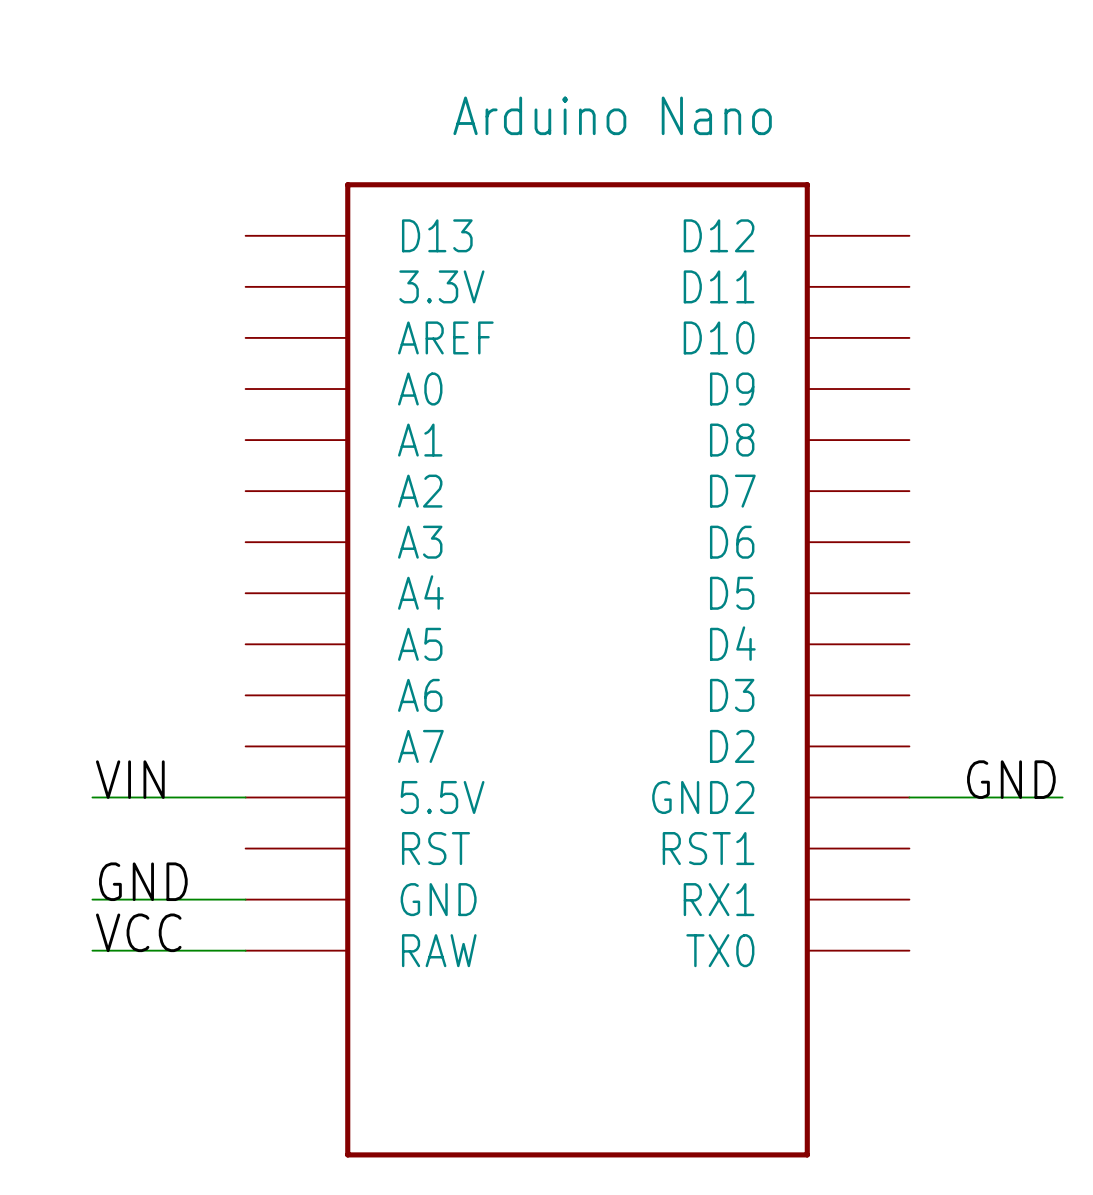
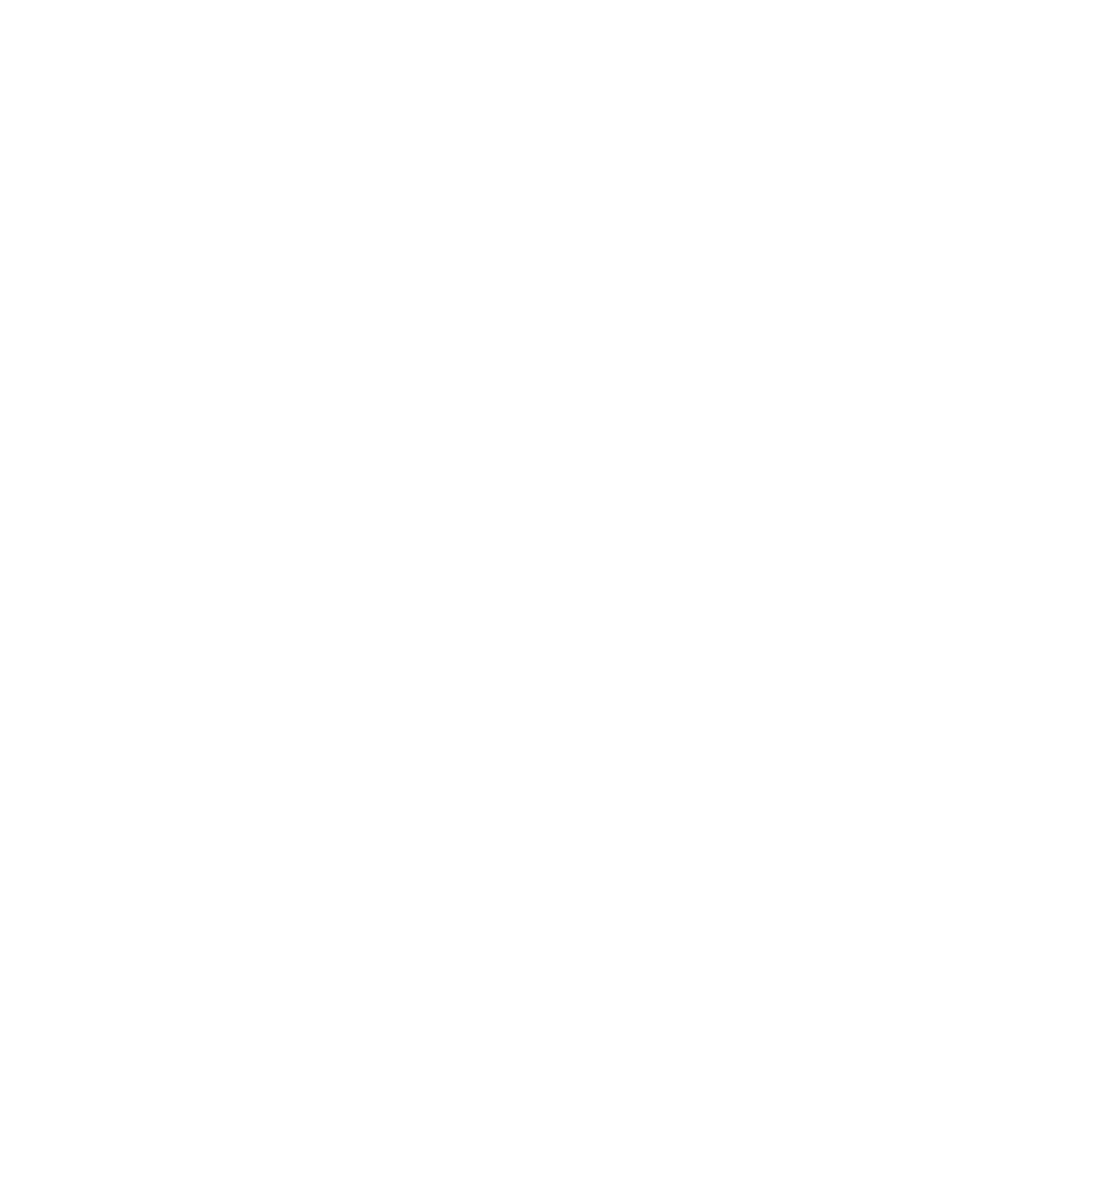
part: (577, 669) -> none
label: VIN (130, 779) -> none
label: GND (1011, 779) -> none
wire: (92, 797) (245, 797) -> none
wire: (909, 797) (1062, 797) -> none
label: GND (143, 881) -> none
wire: (92, 899) (245, 899) -> none
label: VCC (138, 932) -> none
wire: (92, 950) (245, 950) -> none

